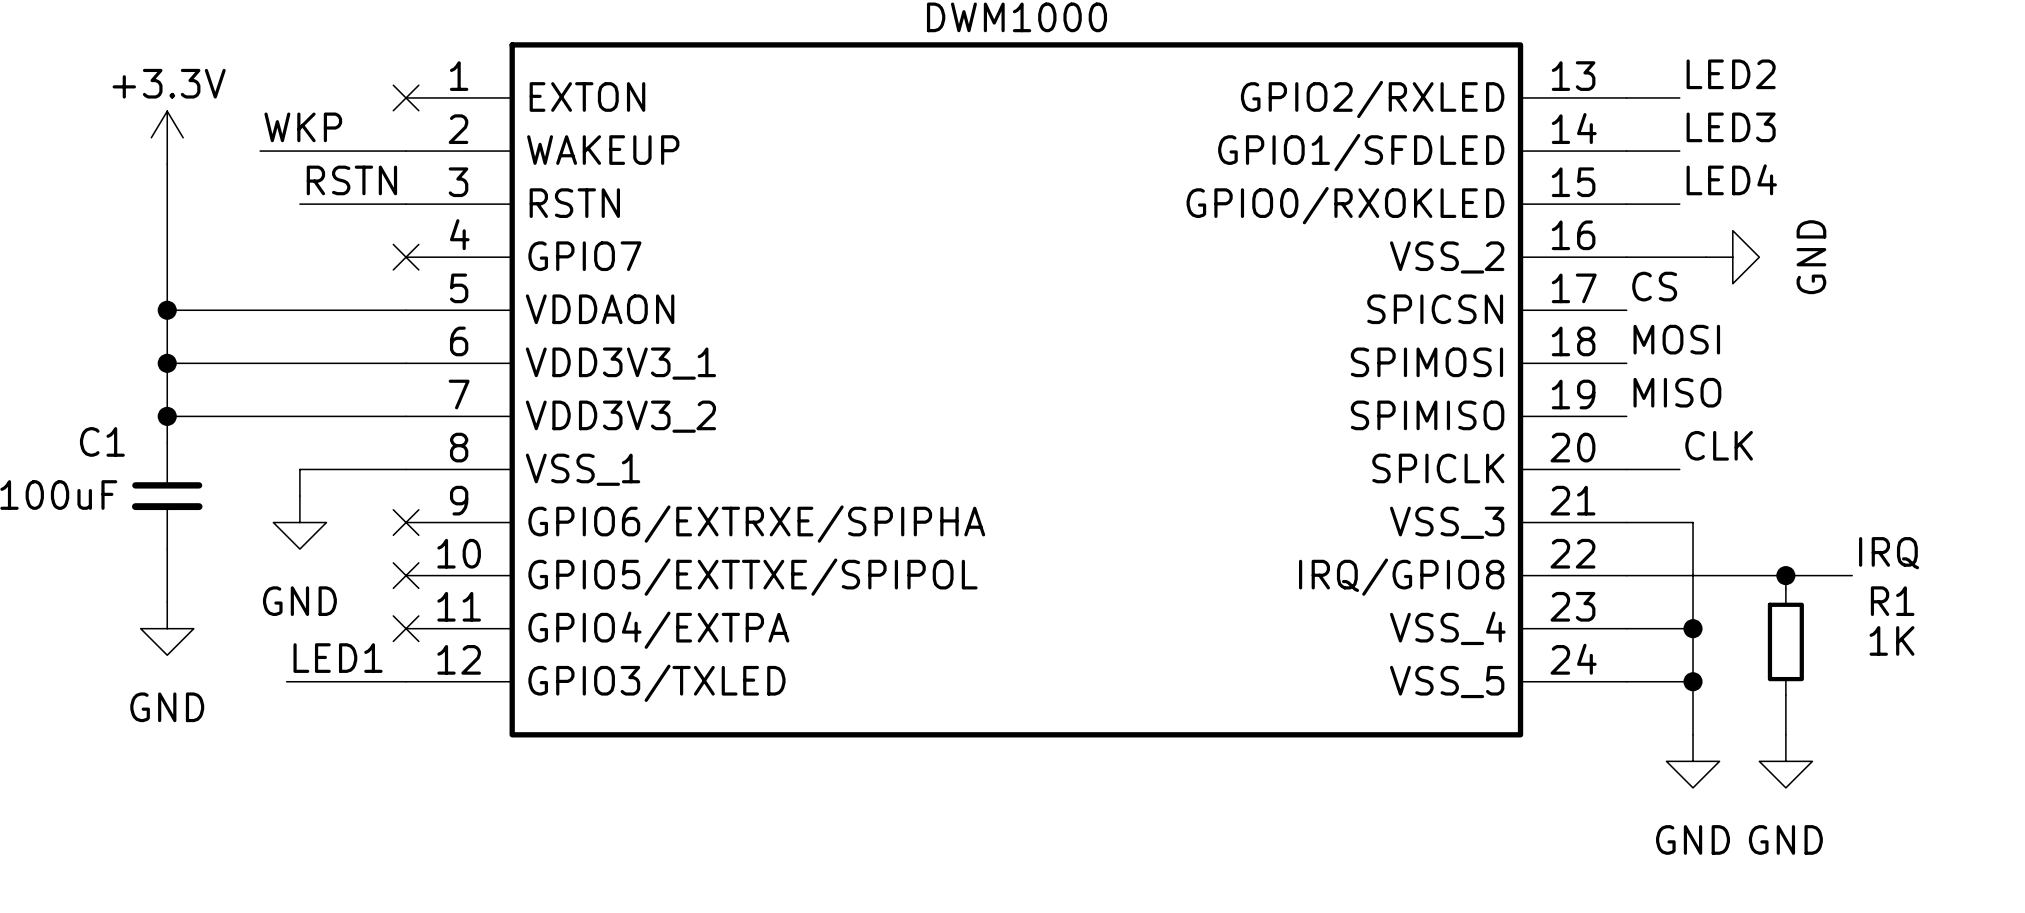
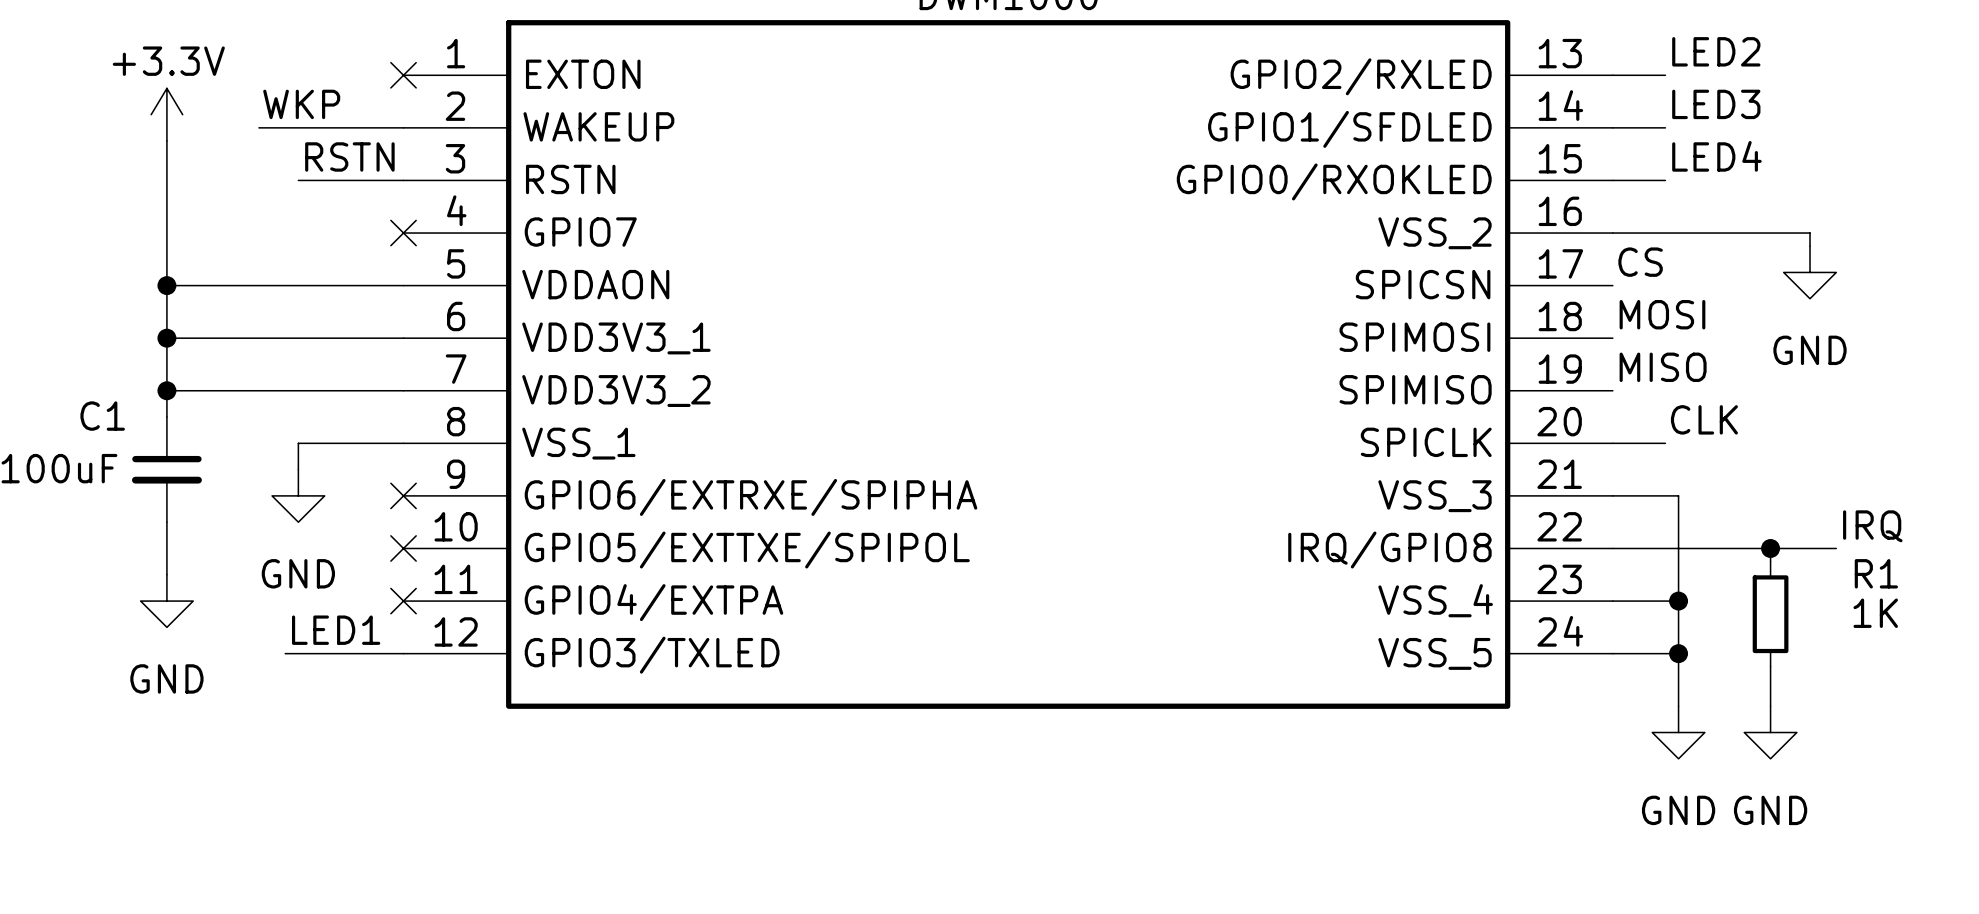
wire: none -> (1691, 233) (1810, 233) (1810, 246)
power symbol rotation: 0° (1732, 257) -> 90° clockwise (1810, 272)
power symbol position: GND (1732, 257) -> GND (1810, 272)

